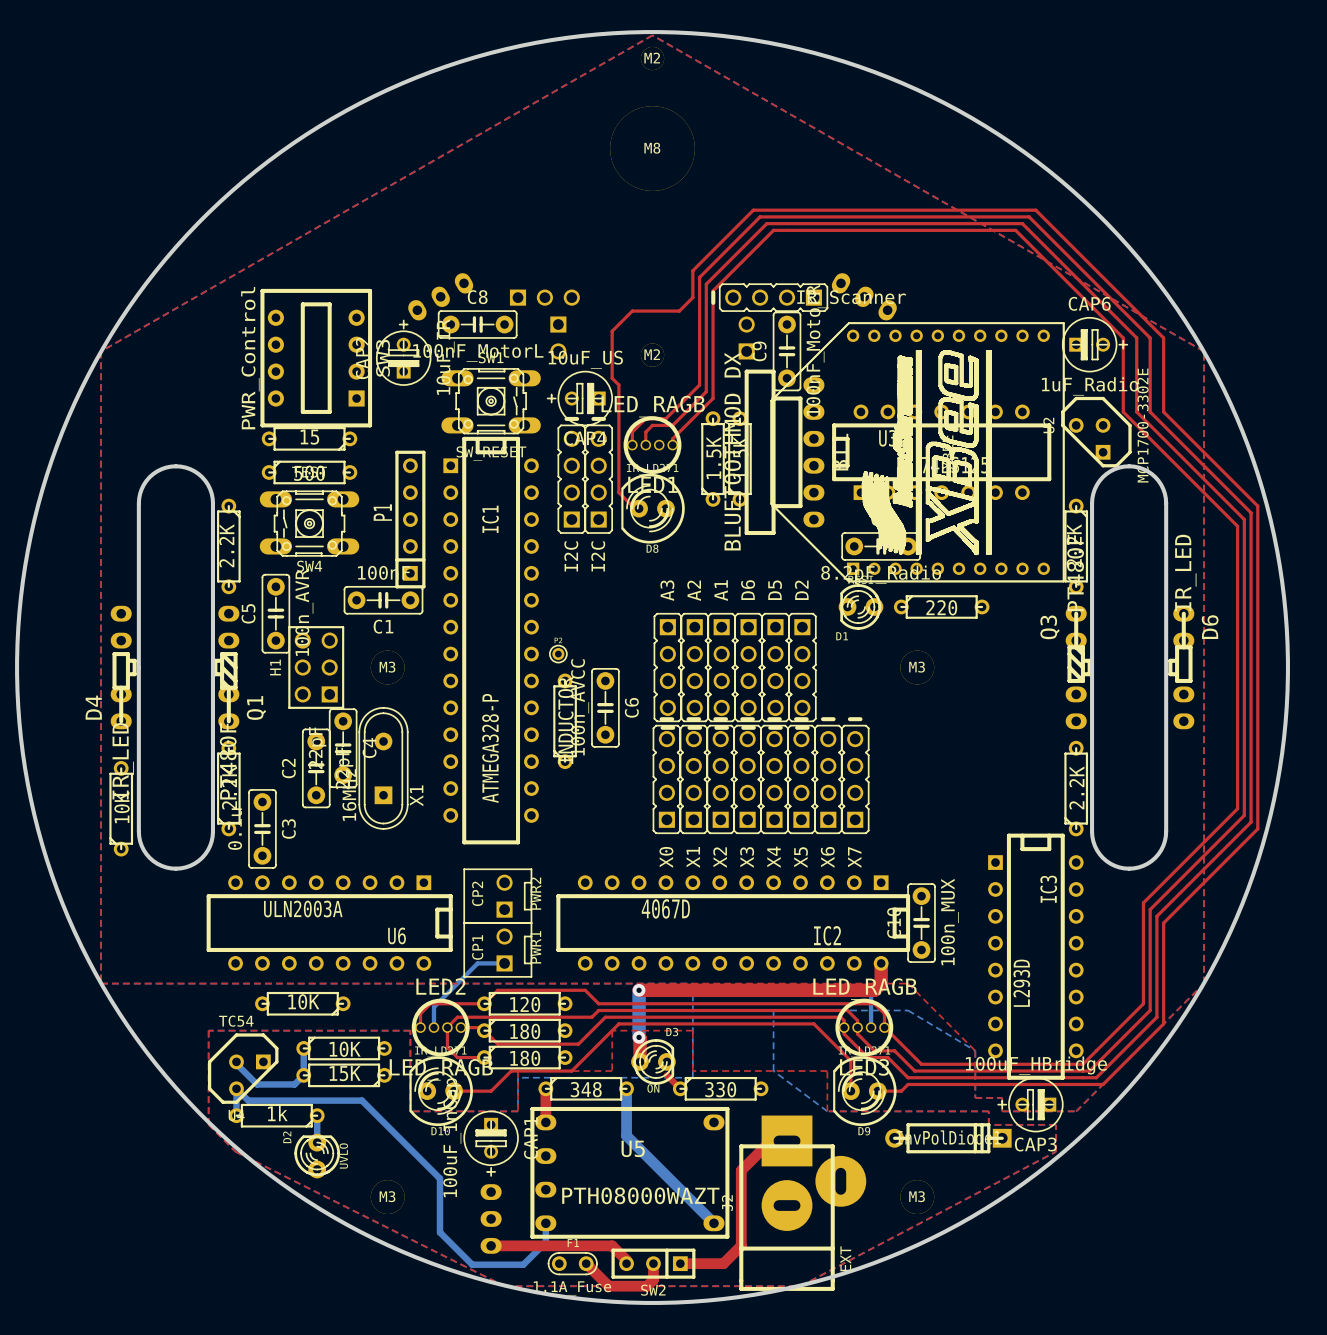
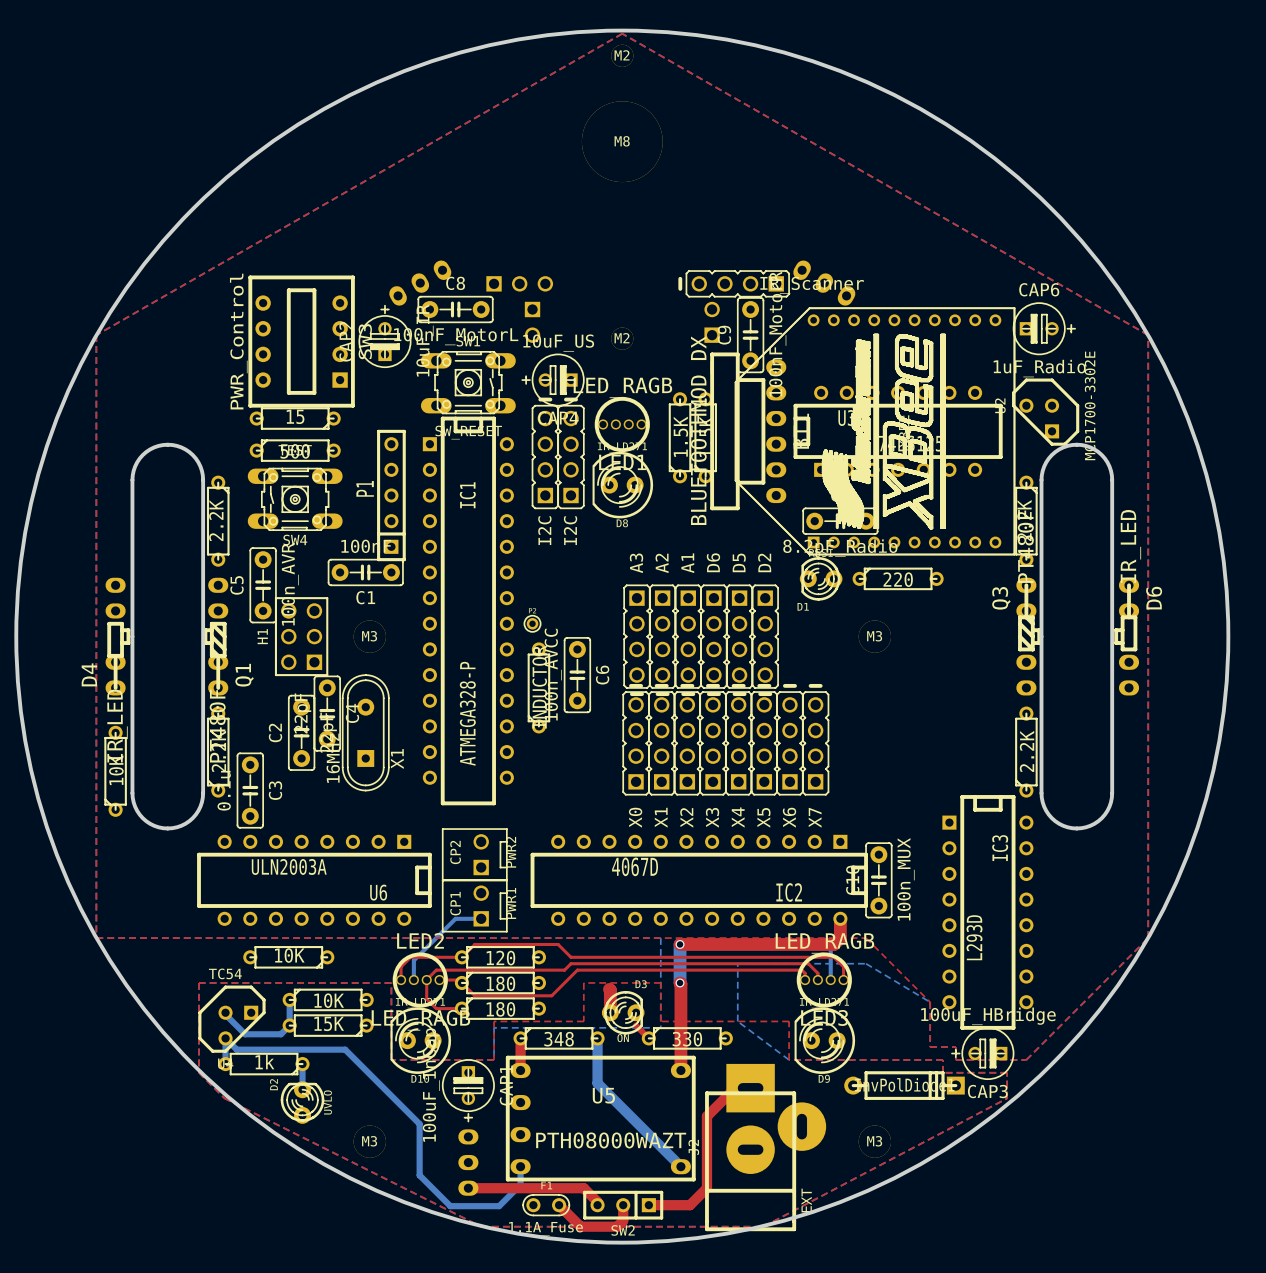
top track: (632, 445) (632, 432) (645, 418) (665, 418) (699, 385) (699, 277) (760, 216) (1029, 216) (1150, 337) (1150, 411) (1251, 512) (1251, 822) (1156, 916) (1156, 1017) (1096, 1077) (908, 1077) (887, 1057) (867, 1057) (844, 1034) (844, 1027) -> none
top track: (645, 445) (645, 432) (652, 425) (672, 425) (706, 391) (706, 284) (766, 223) (1022, 223) (1136, 337) (1136, 411) (1244, 519) (1244, 815) (1150, 909) (1150, 1010) (1089, 1071) (914, 1071) (894, 1050) (874, 1050) (857, 1034) (857, 1027) -> none
top track: (672, 445) (672, 438) (713, 398) (713, 290) (773, 230) (1015, 230) (1123, 337) (1123, 411) (1237, 526) (1237, 808) (1143, 902) (1143, 1003) (1082, 1064) (921, 1064) (884, 1027) -> none
top track: (639, 508) (634, 508) (618, 492) (618, 385) (612, 378) (612, 331) (632, 311) (679, 311) (692, 297) (692, 270) (753, 210) (1035, 210) (1163, 337) (1163, 411) (1257, 506) (1257, 828) (1163, 923) (1163, 1023) (1103, 1084) (908, 1084) (901, 1091) (877, 1091) -> none
top track: (639, 990) (713, 990) -> none
bottom track: (639, 990) (639, 1037) -> none
via: (639, 990) -> none
bottom track: none -> (680, 944) (680, 982)
via: none -> (680, 944)
top track: none -> (680, 982) (680, 1070)
via: none -> (680, 982)
via: (639, 1037) -> none
top track: (454, 1091) (491, 1091) (511, 1071) (571, 1071) (618, 1023) (813, 1023) (850, 1060) (850, 1091) -> none

